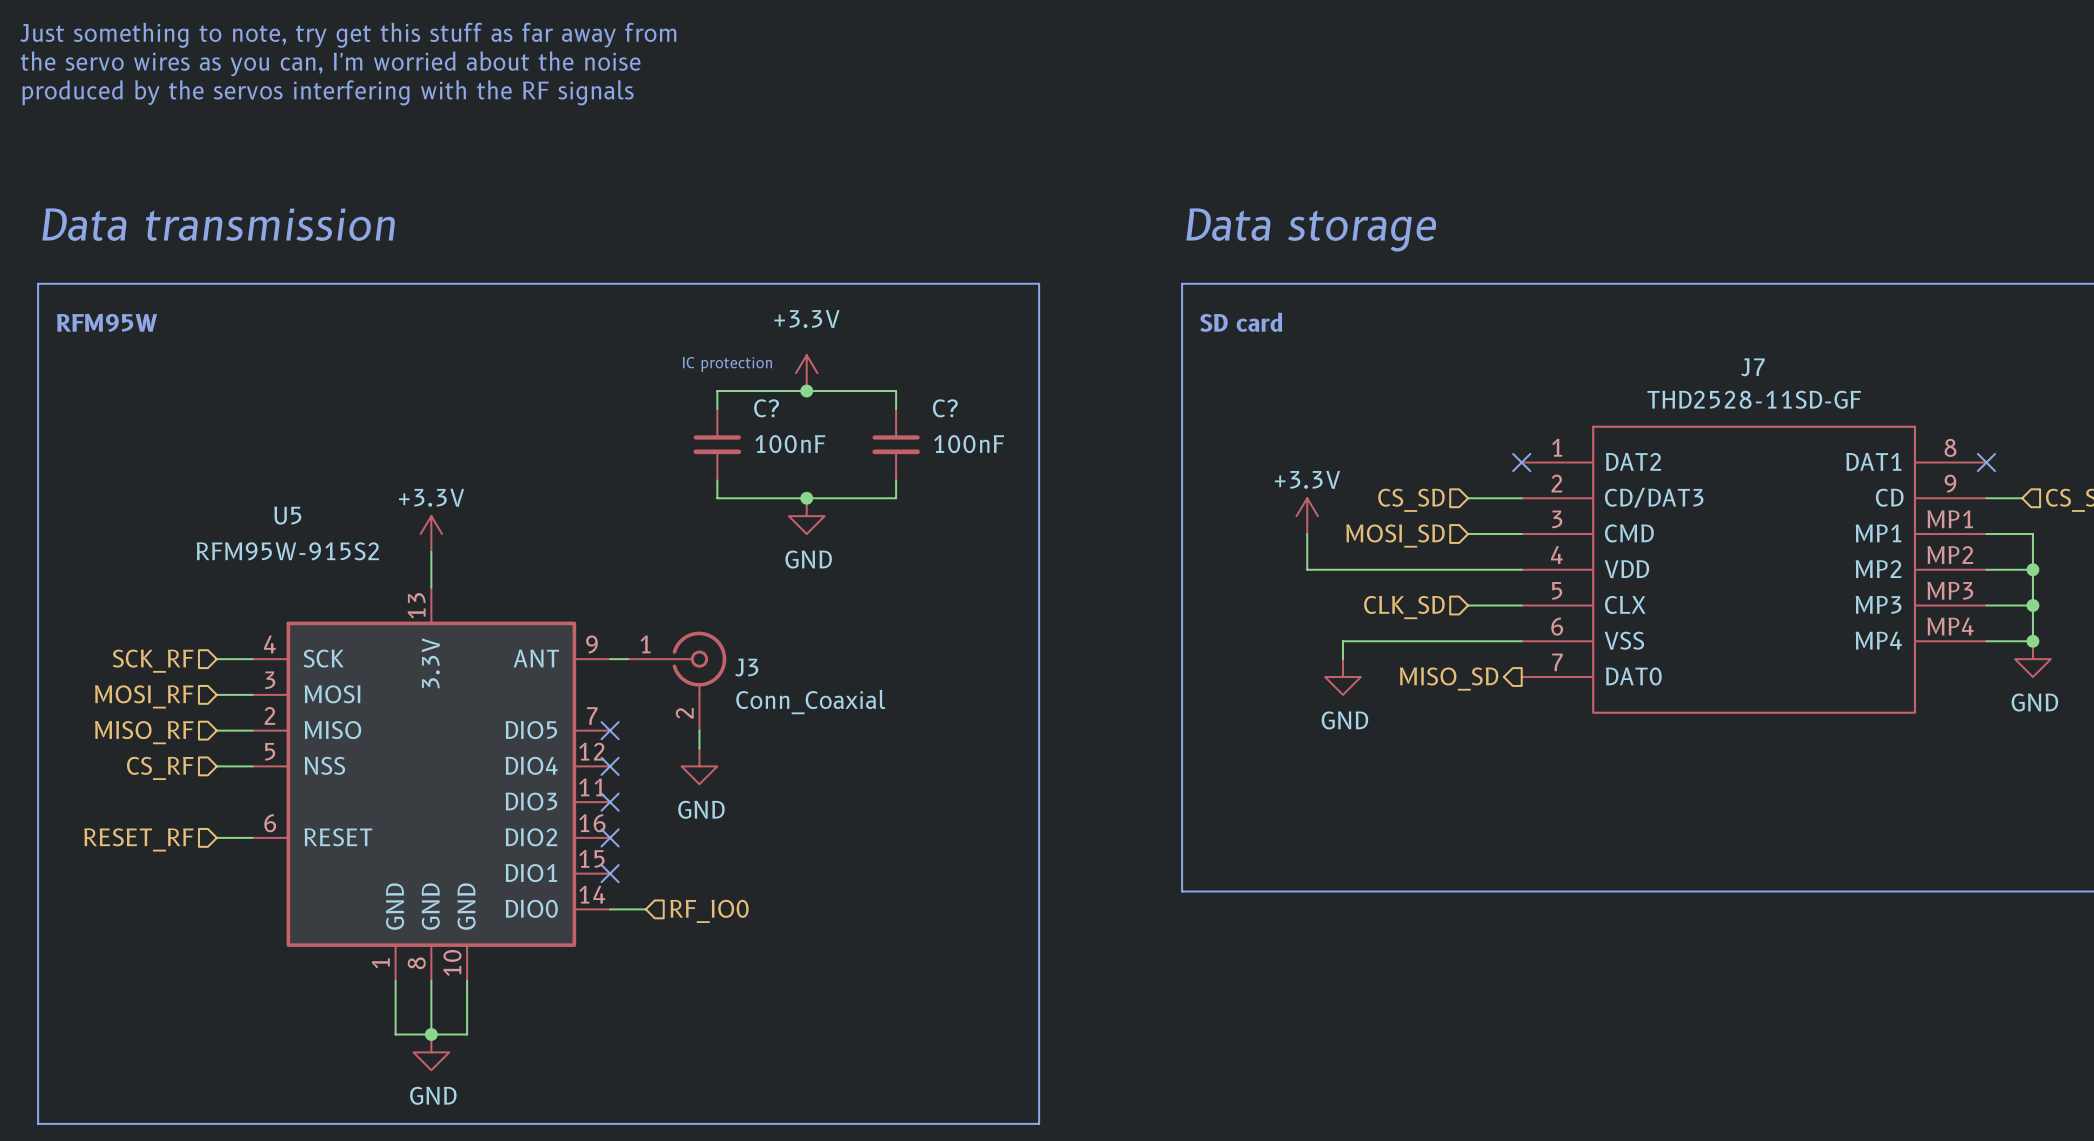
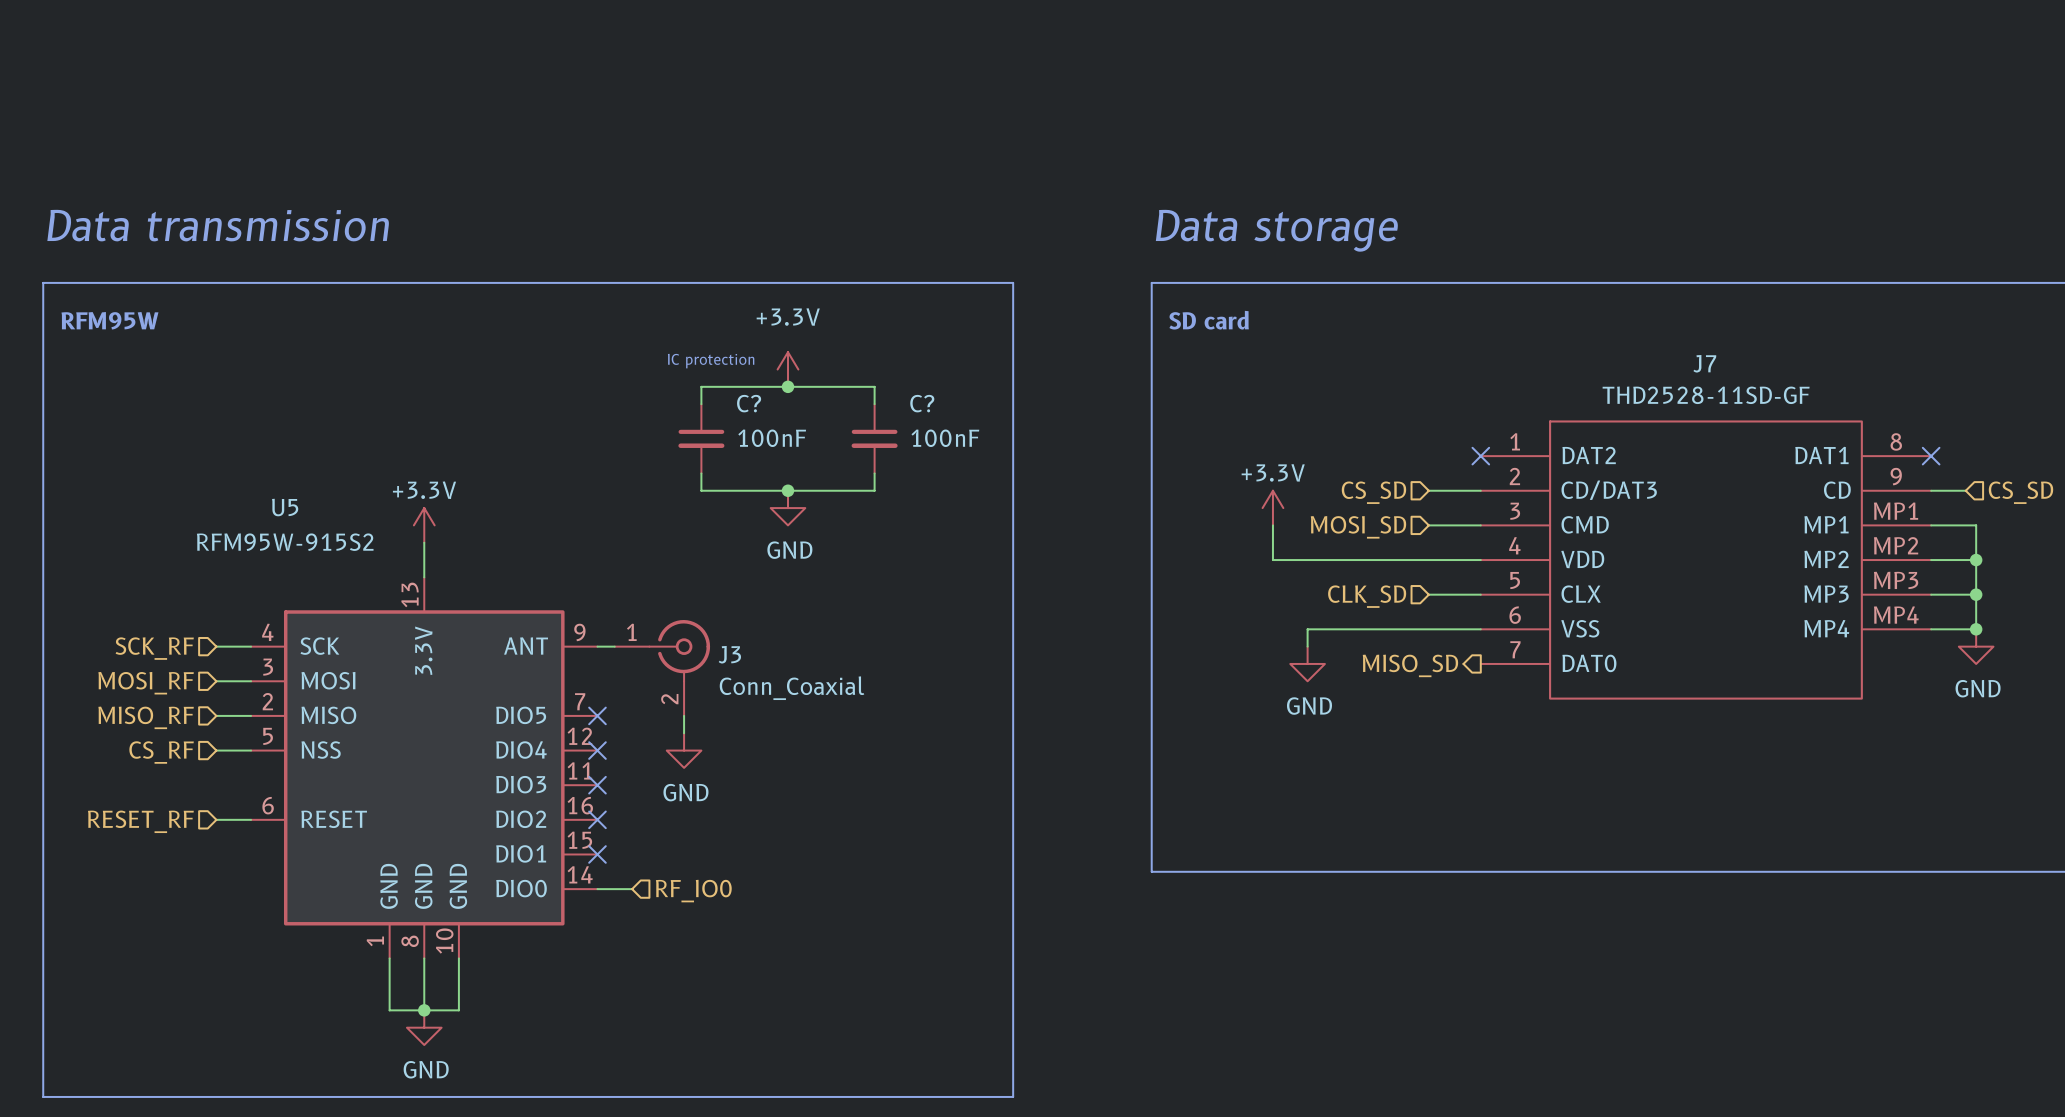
text: Just something to note, try get this stuff as far away from (348, 35) -> none
text: the servo wires as you can, I'm worried about the noise (330, 63) -> none
text: produced by the servos interfering with the RF signals (328, 92) -> none

